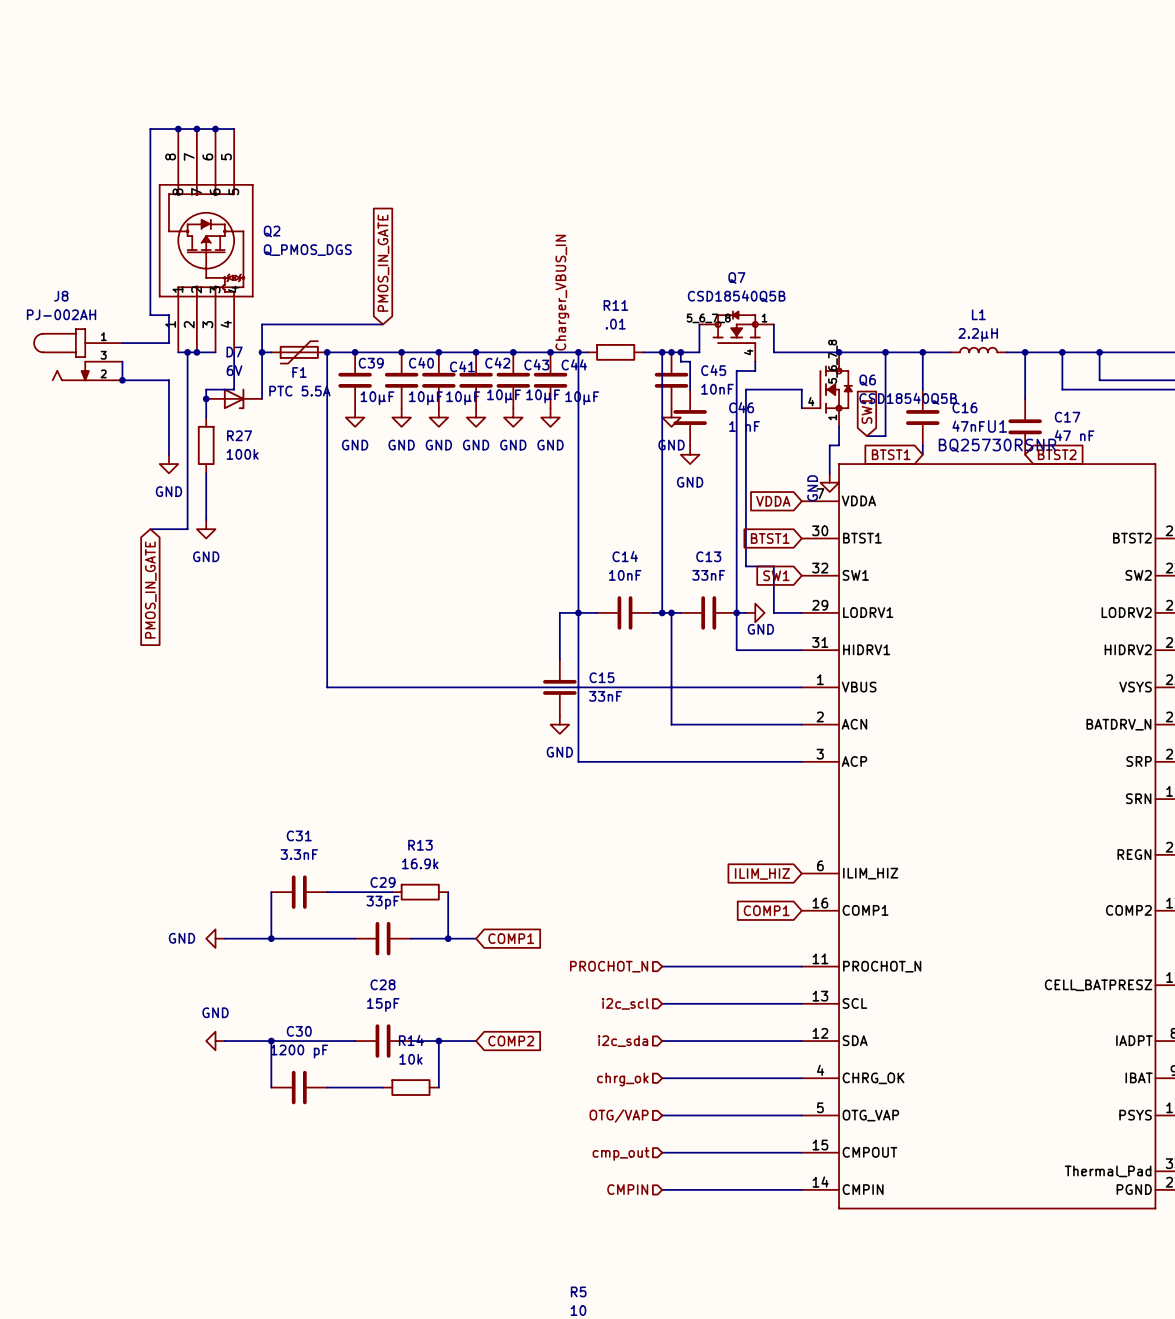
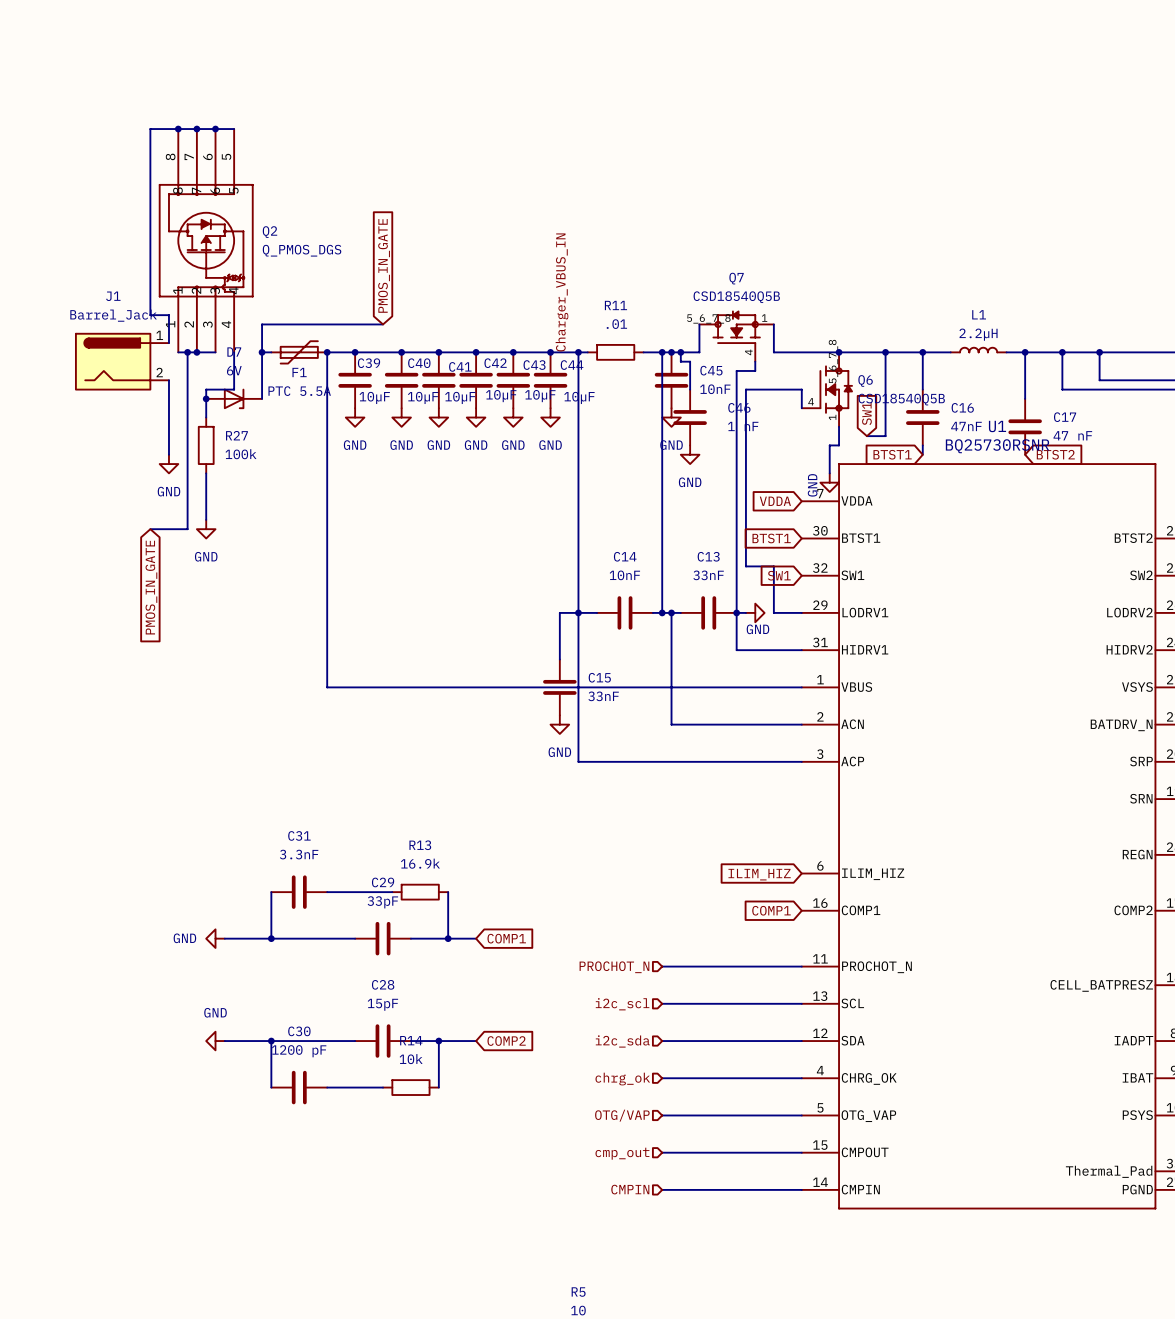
J8: PJ-002AH (77, 354) -> none
J1: none -> Barrel_Jack (121, 361)
junction: (122, 380) -> none

